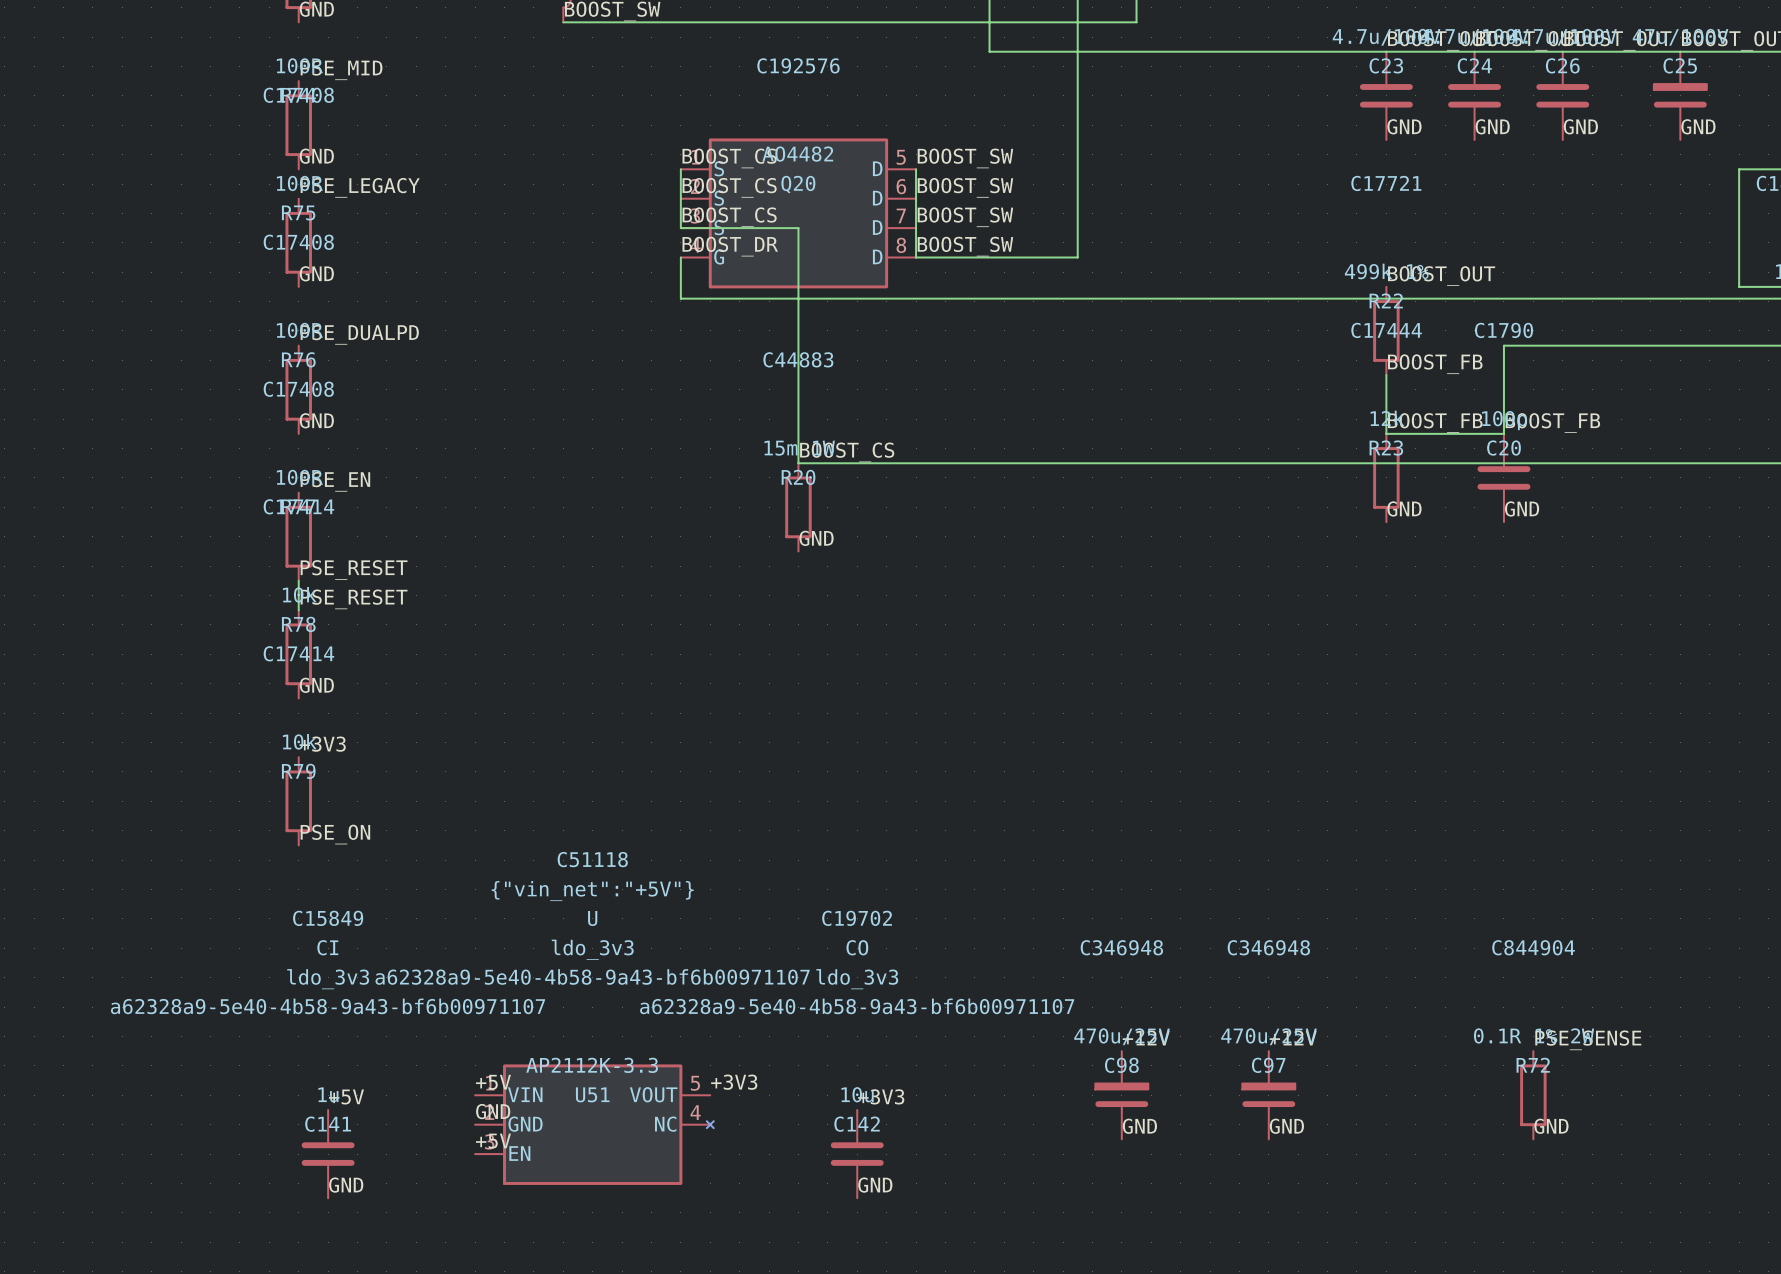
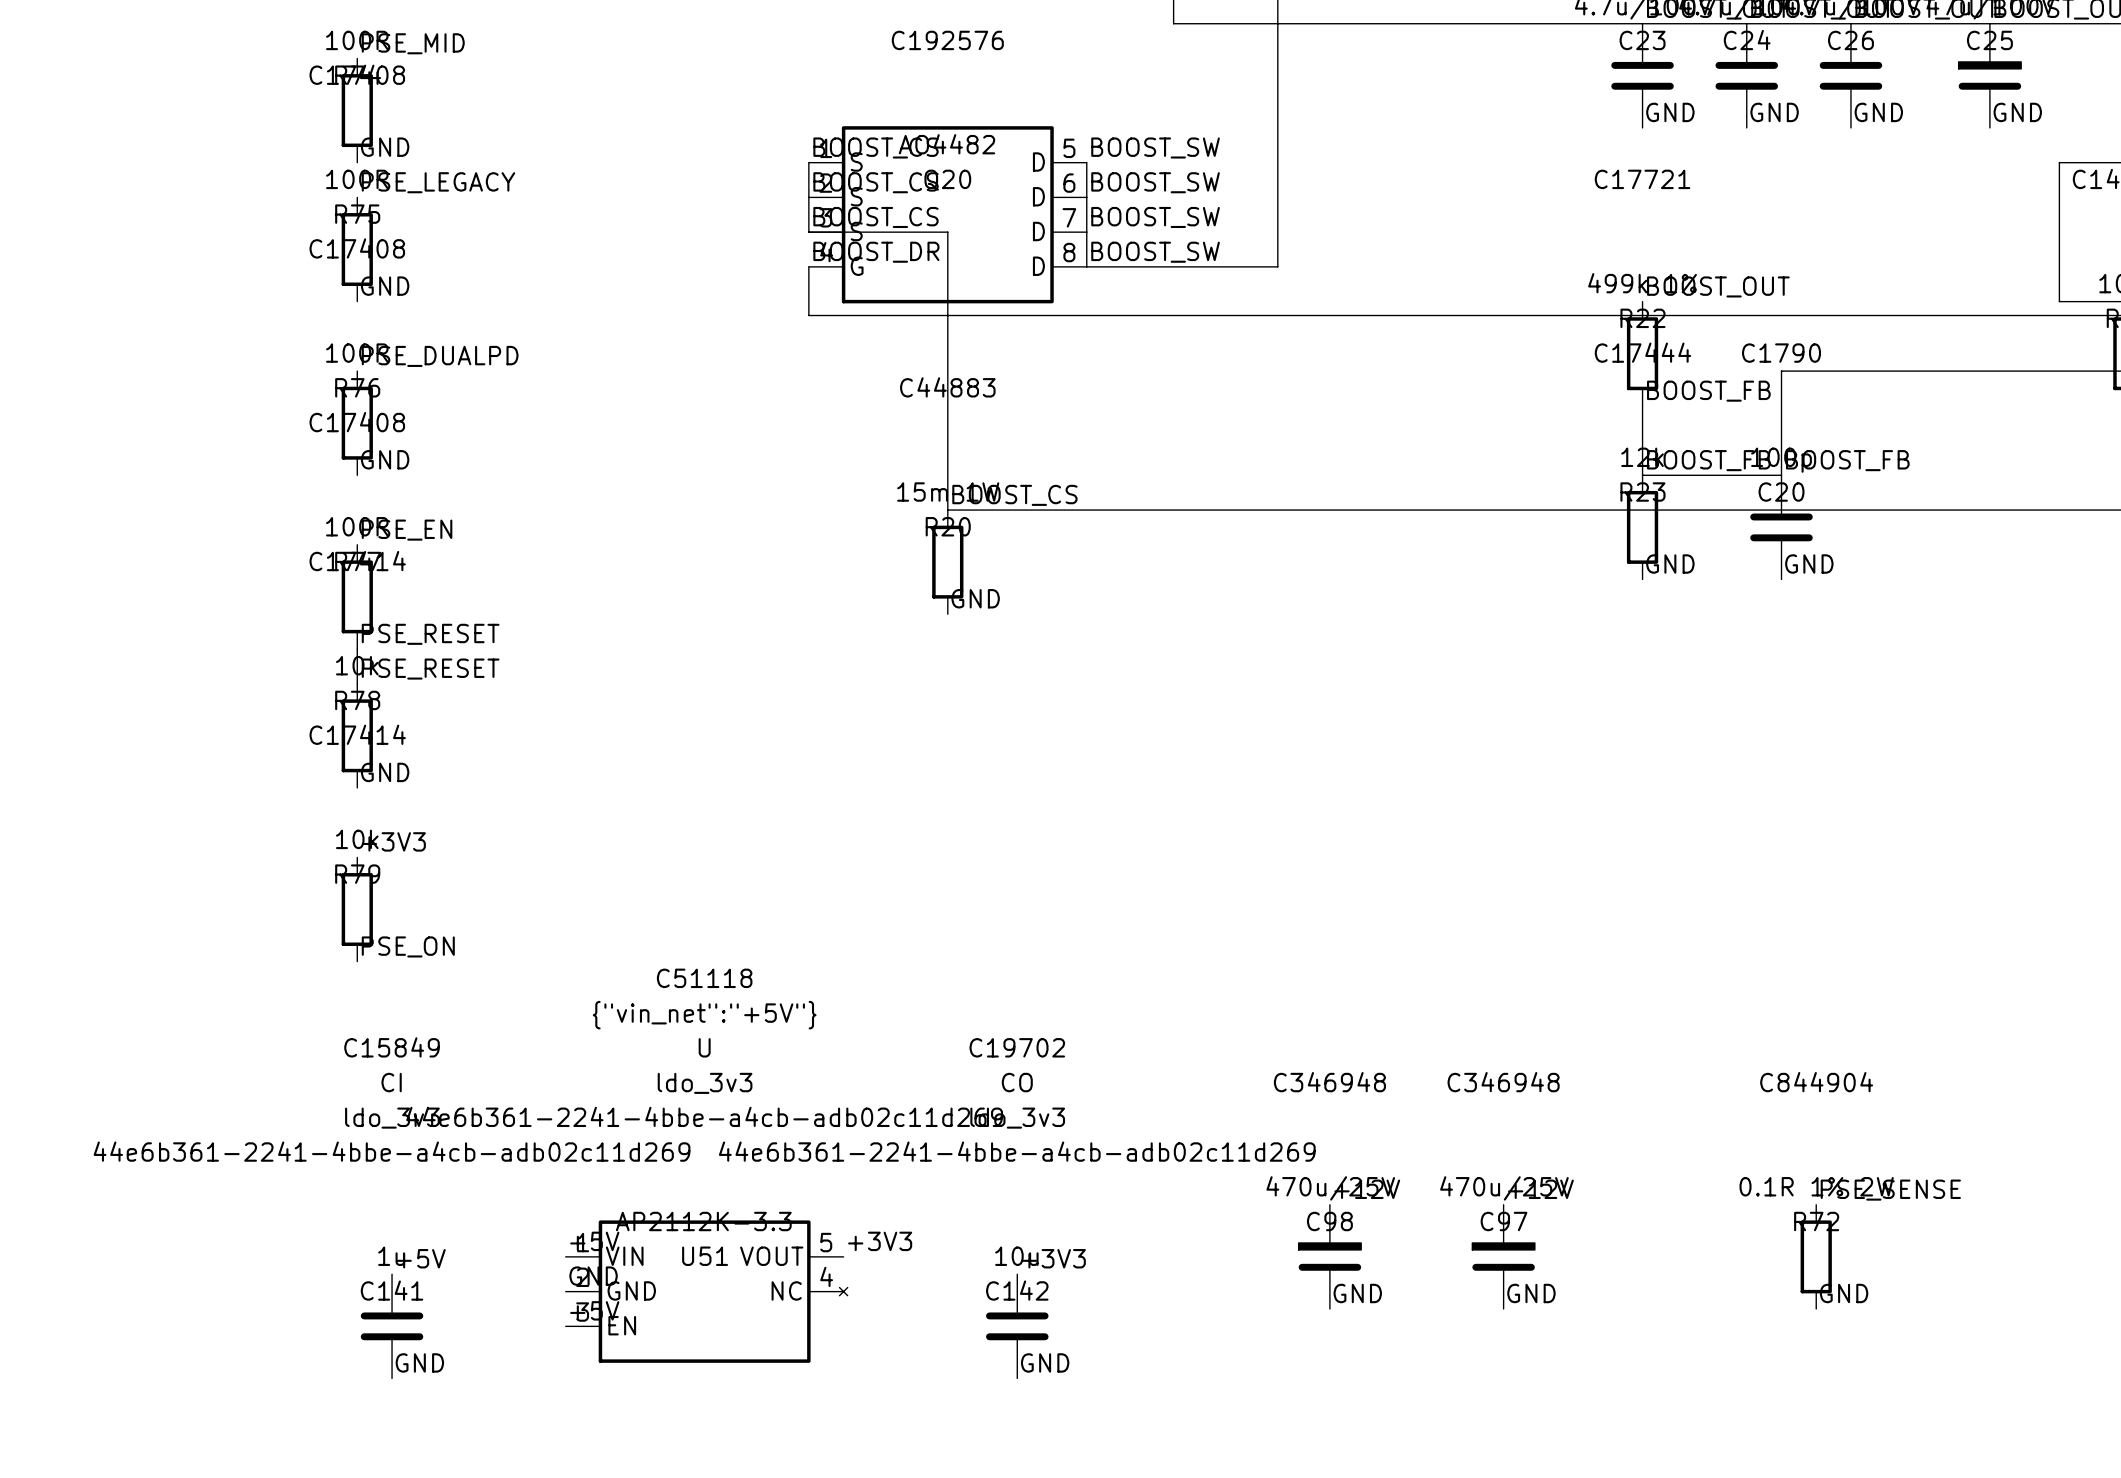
U51 text: a62328a9-5e40-4b58-9a43-bf6b00971107 (592, 976) -> 44e6b361-2241-4bbe-a4cb-adb02c11d269 (704, 1116)
C141 text: a62328a9-5e40-4b58-9a43-bf6b00971107 (328, 1006) -> 44e6b361-2241-4bbe-a4cb-adb02c11d269 (392, 1151)
C142 text: a62328a9-5e40-4b58-9a43-bf6b00971107 (857, 1006) -> 44e6b361-2241-4bbe-a4cb-adb02c11d269 (1017, 1151)

